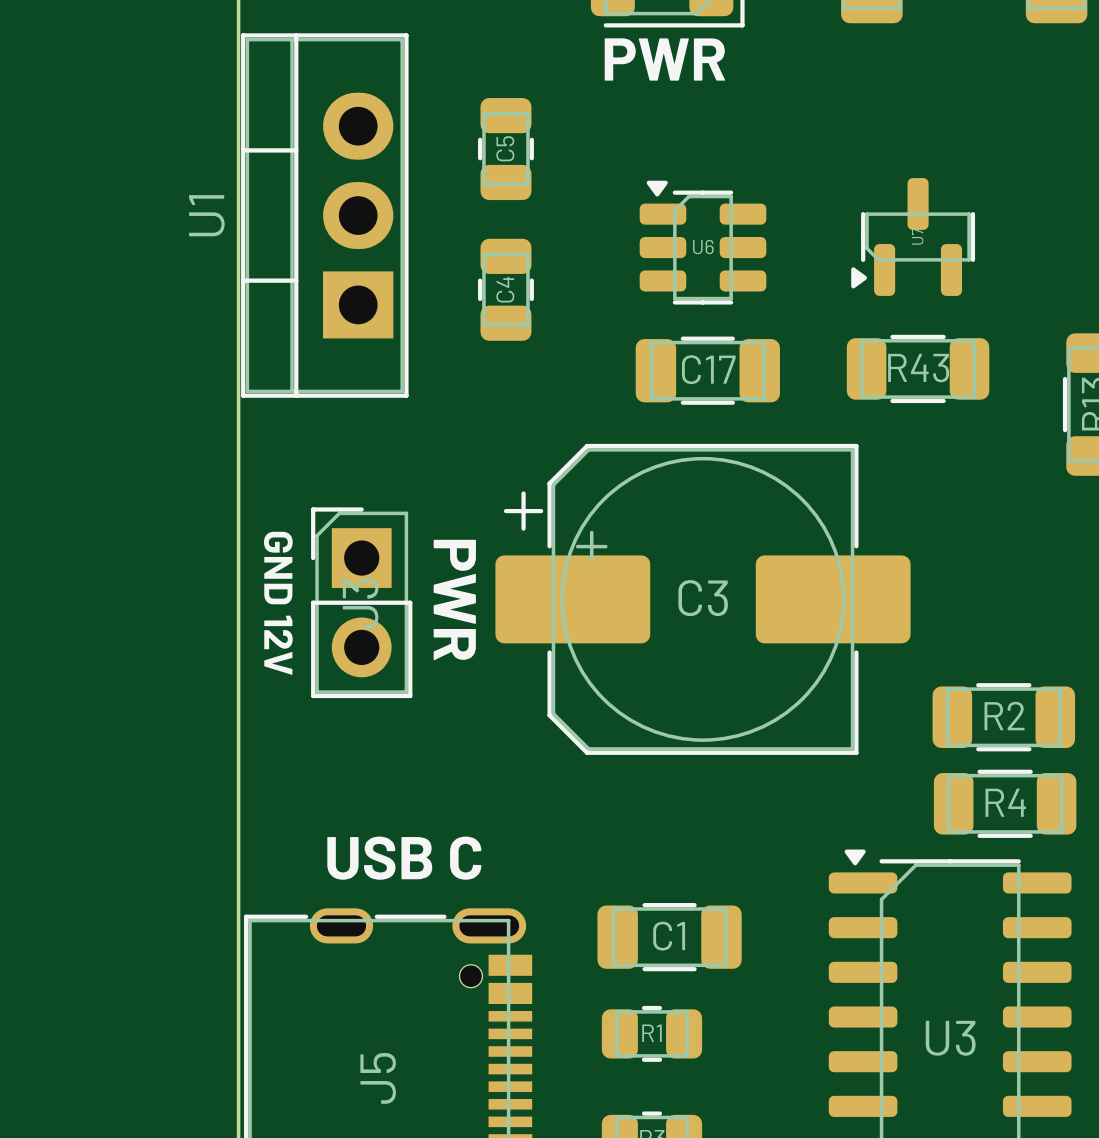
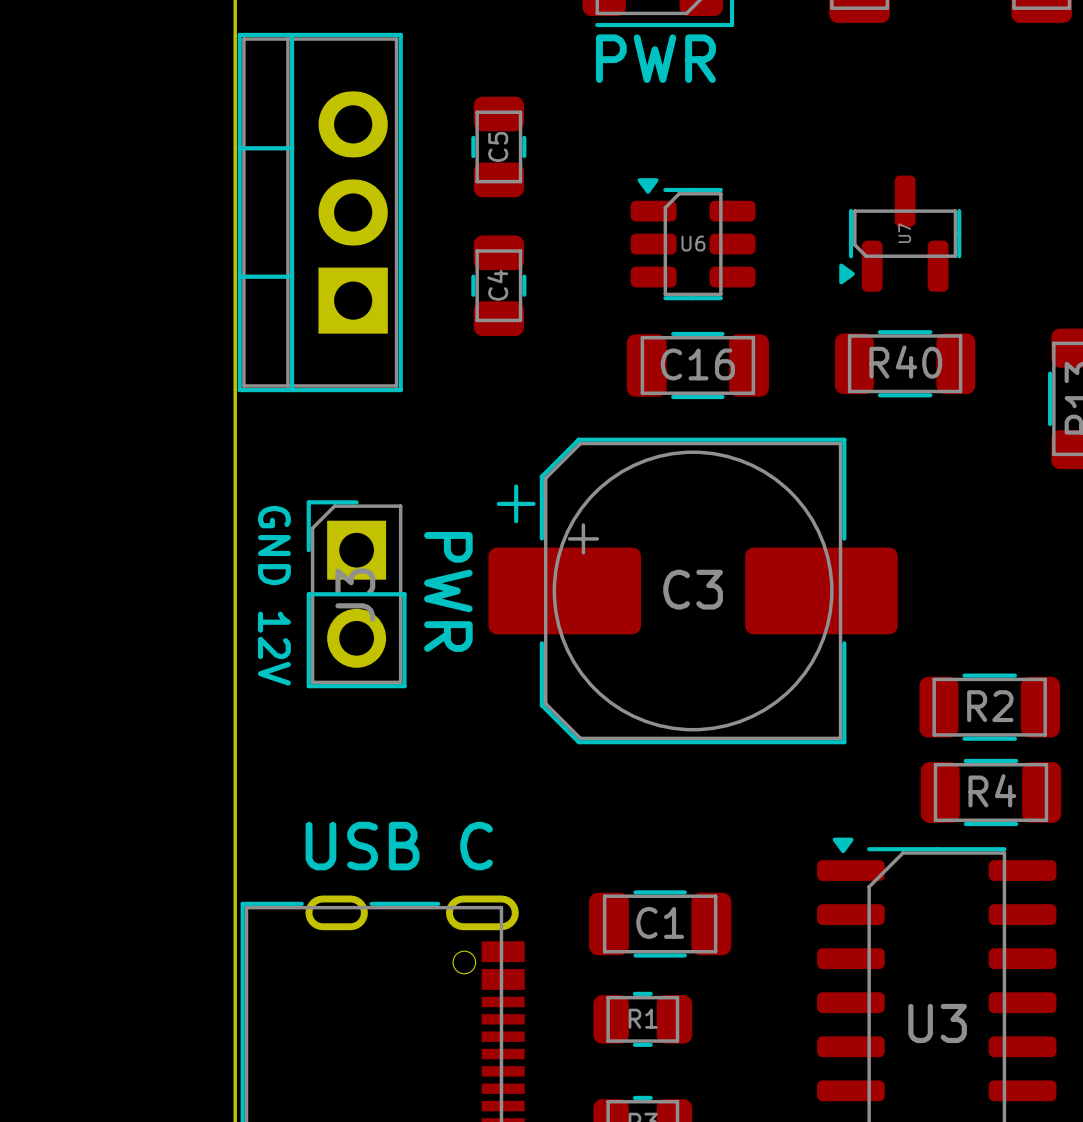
U1 name: U1 (206, 215) -> none
R43 name: R43 (918, 368) -> R40 (905, 362)
C17 name: C17 (708, 369) -> C16 (697, 364)
J5 name: J5 (378, 1078) -> none

